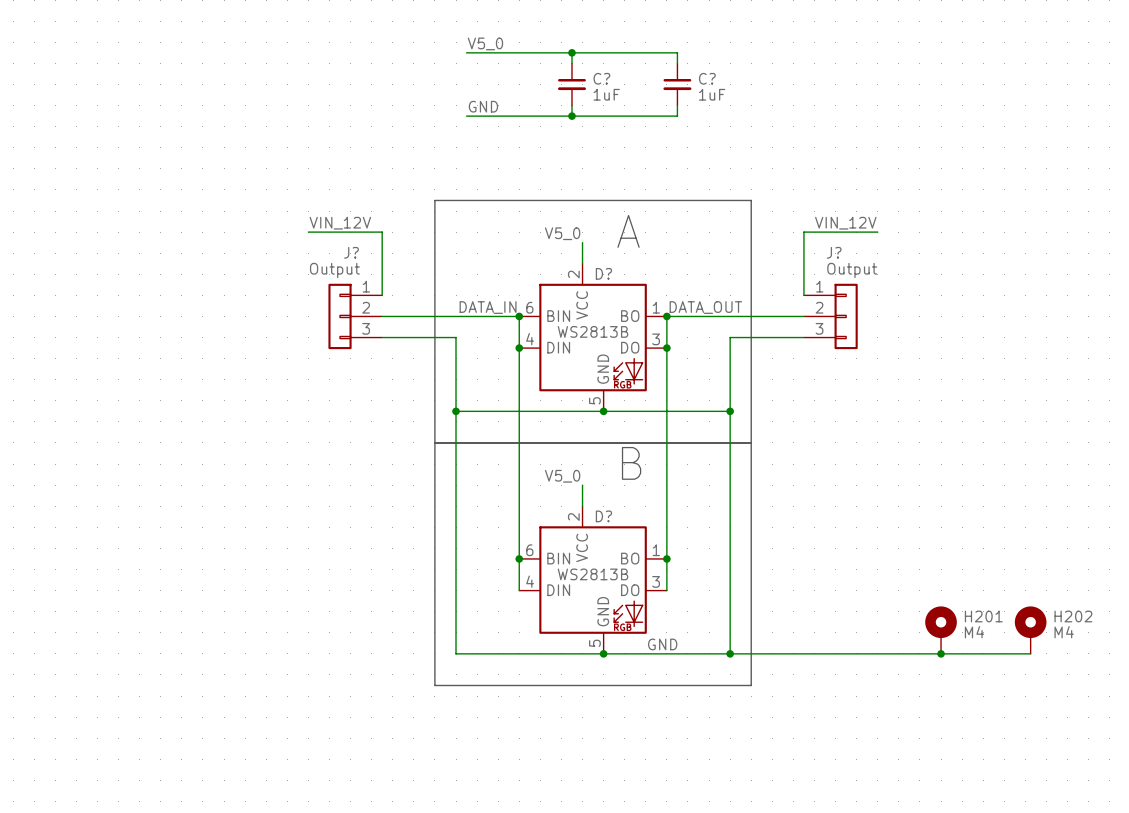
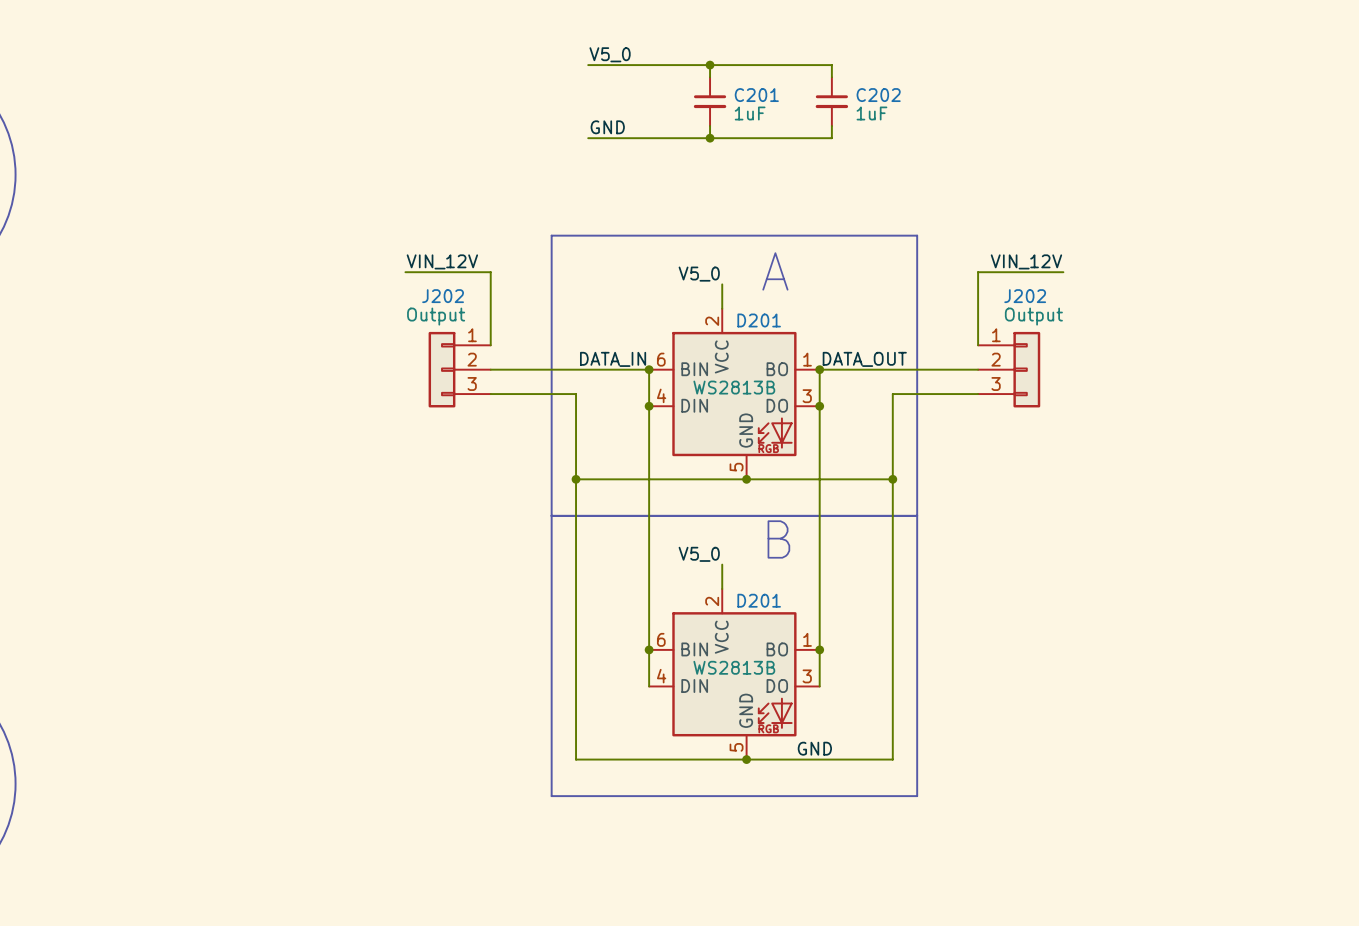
C? name: C? (601, 78) -> C201 (756, 95)
C? name: C? (707, 78) -> C202 (878, 95)
J? name: J? (351, 252) -> J202 (443, 296)
J? name: J? (834, 252) -> J202 (1025, 296)
D? name: D? (603, 273) -> D201 (759, 320)
D? name: D? (603, 516) -> D201 (759, 600)
H201: M4 (941, 630) -> none
H202: M4 (1030, 630) -> none
wire: (730, 653) (1030, 653) -> none
junction: (730, 653) -> none
junction: (941, 653) -> none

